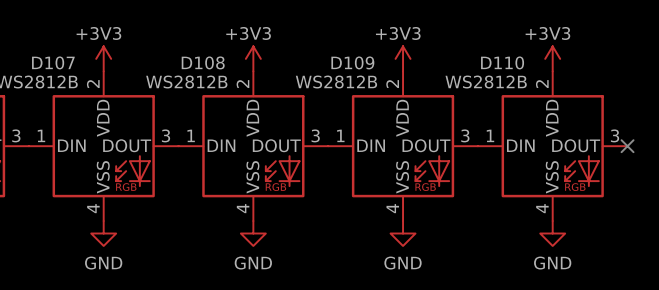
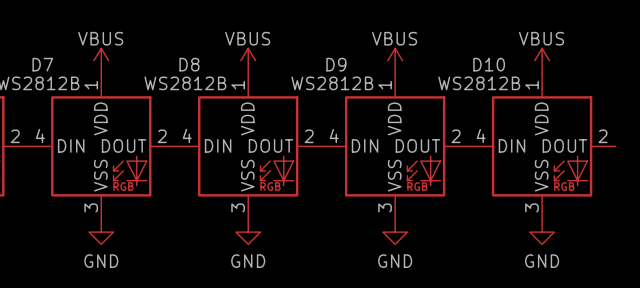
power symbol: +3V3 (103, 58) -> VBUS (101, 60)
power symbol: +3V3 (253, 58) -> VBUS (248, 60)
power symbol: +3V3 (403, 58) -> VBUS (395, 60)
power symbol: +3V3 (552, 58) -> VBUS (542, 60)
D107 name: D107 (53, 62) -> D7 (42, 64)
D108 name: D108 (203, 62) -> D8 (189, 64)
D109 name: D109 (352, 62) -> D9 (336, 64)
D110 name: D110 (502, 62) -> D10 (489, 64)
D107 pin number: 2 (93, 84) -> 1 (91, 85)
D108 pin number: 2 (242, 84) -> 1 (238, 85)
D109 pin number: 2 (392, 84) -> 1 (385, 85)
D110 pin number: 2 (542, 84) -> 1 (532, 85)
part pin number: 3 (16, 135) -> 2 (15, 136)
D107 pin number: 1 (41, 135) -> 4 (40, 136)
D107 pin number: 3 (166, 135) -> 2 (162, 136)
D108 pin number: 1 (191, 135) -> 4 (187, 136)
D108 pin number: 3 (315, 135) -> 2 (309, 136)
D109 pin number: 1 (340, 135) -> 4 (334, 136)
D109 pin number: 3 (465, 135) -> 2 (456, 136)
D110 pin number: 1 (490, 135) -> 4 (481, 136)
D110 pin number: 3 (615, 135) -> 2 (603, 136)
no-connect mark: (627, 146) -> none
D107 pin number: 4 (93, 208) -> 3 (91, 207)
D108 pin number: 4 (243, 208) -> 3 (238, 207)
D109 pin number: 4 (392, 208) -> 3 (385, 207)
D110 pin number: 4 (542, 208) -> 3 (532, 207)

